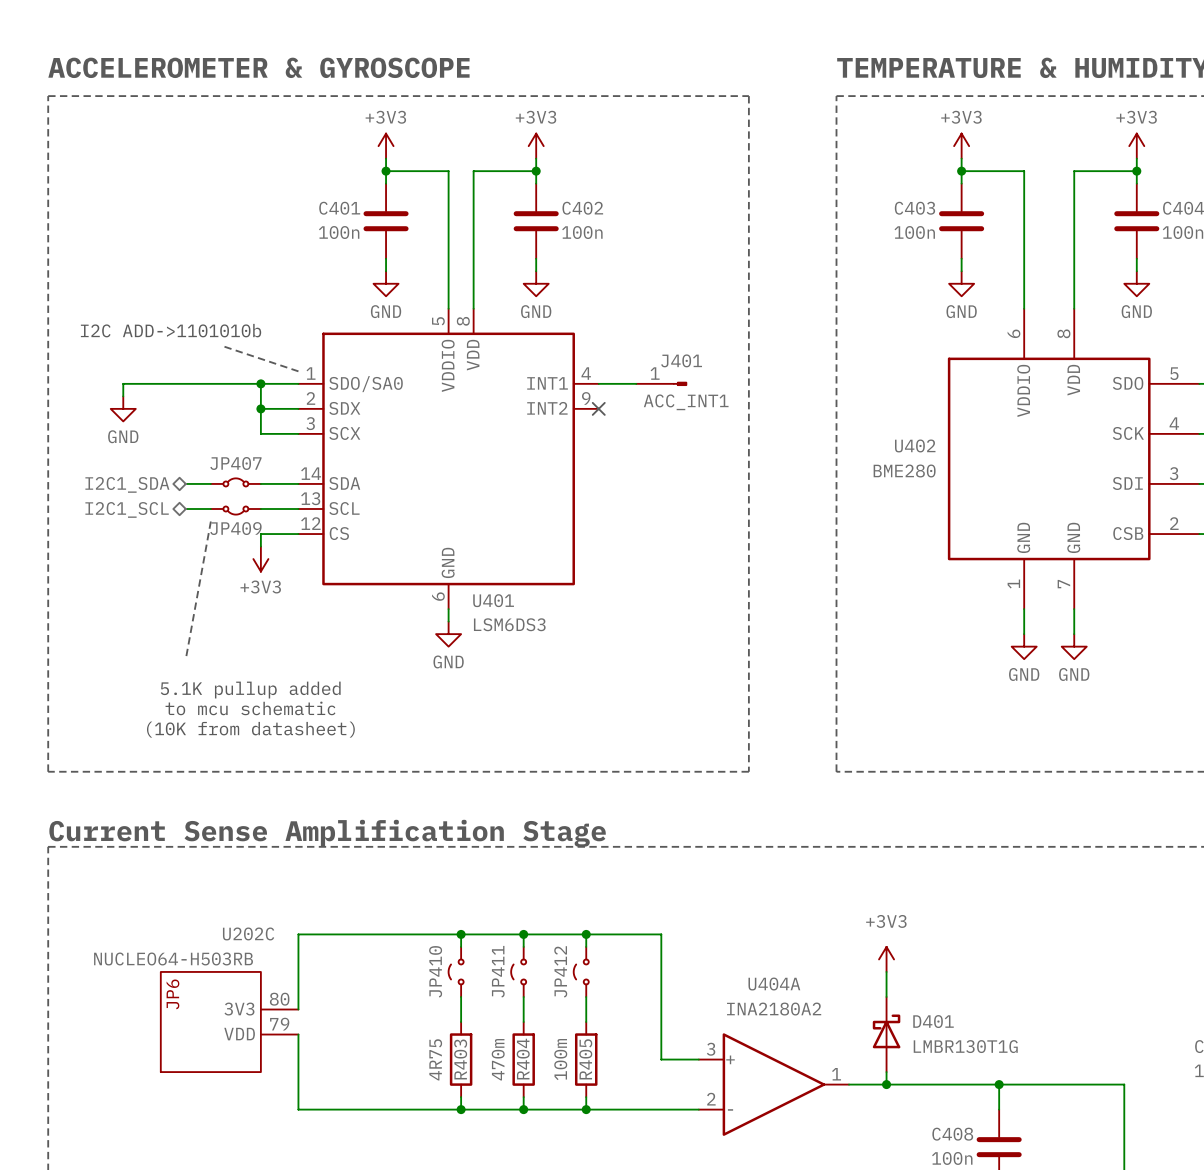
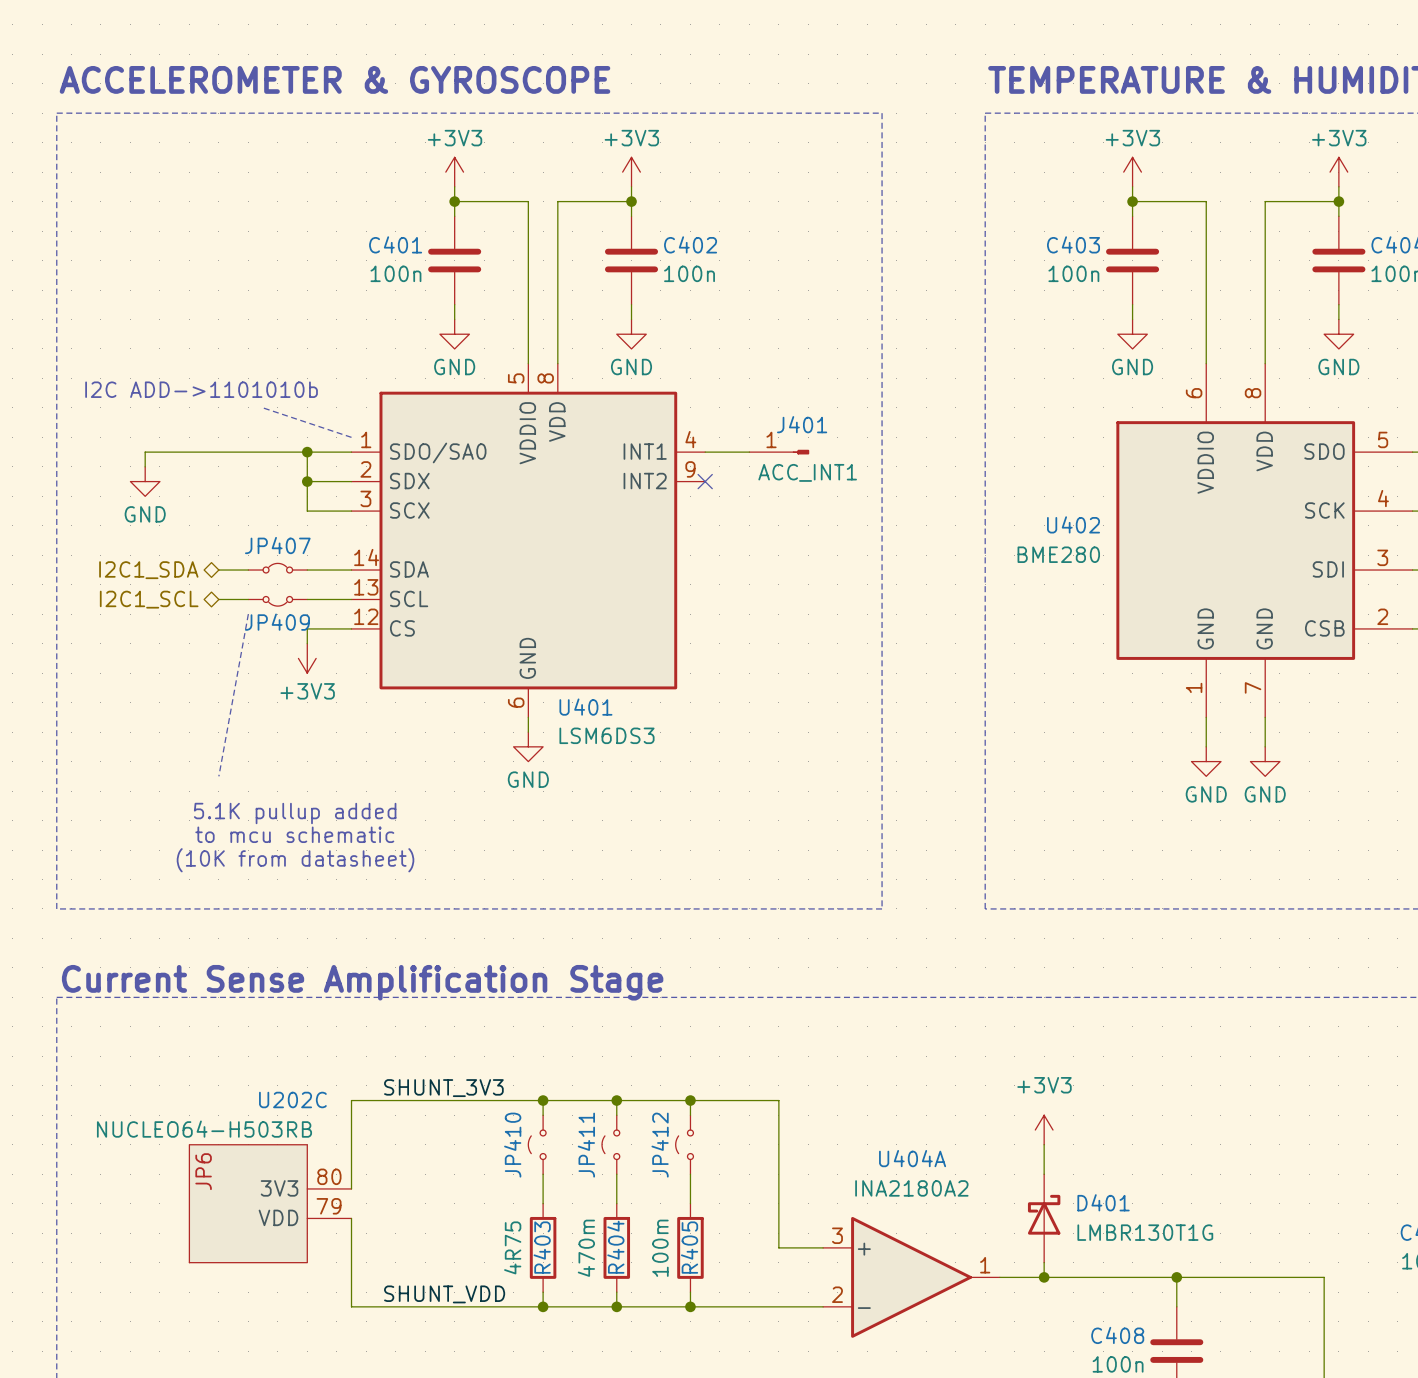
label: none -> SHUNT_3V3 (443, 1088)
label: none -> SHUNT_VDD (444, 1294)

